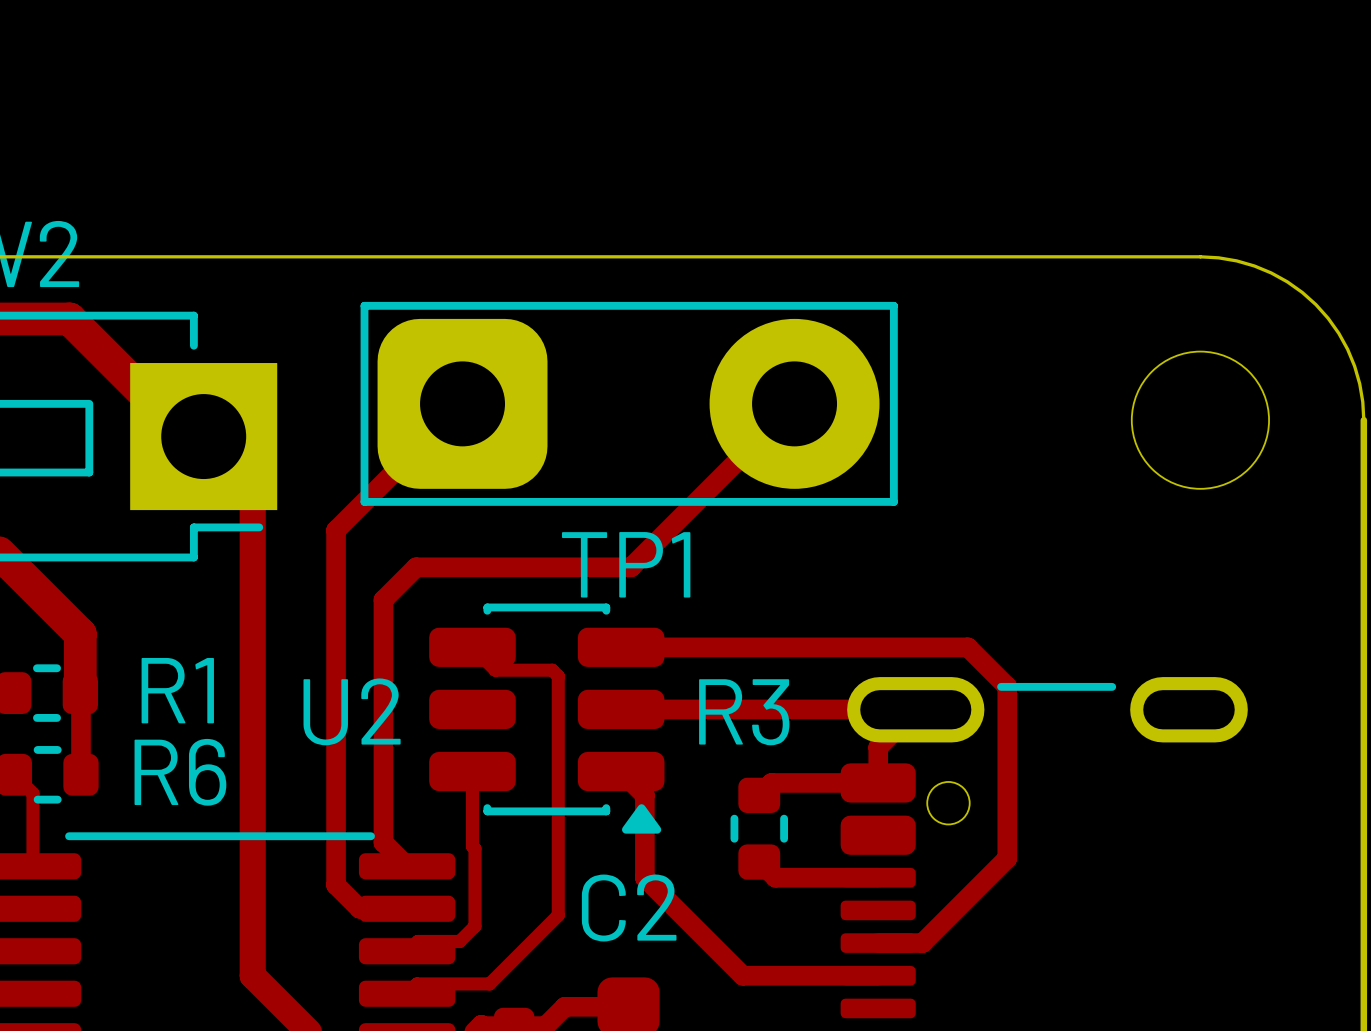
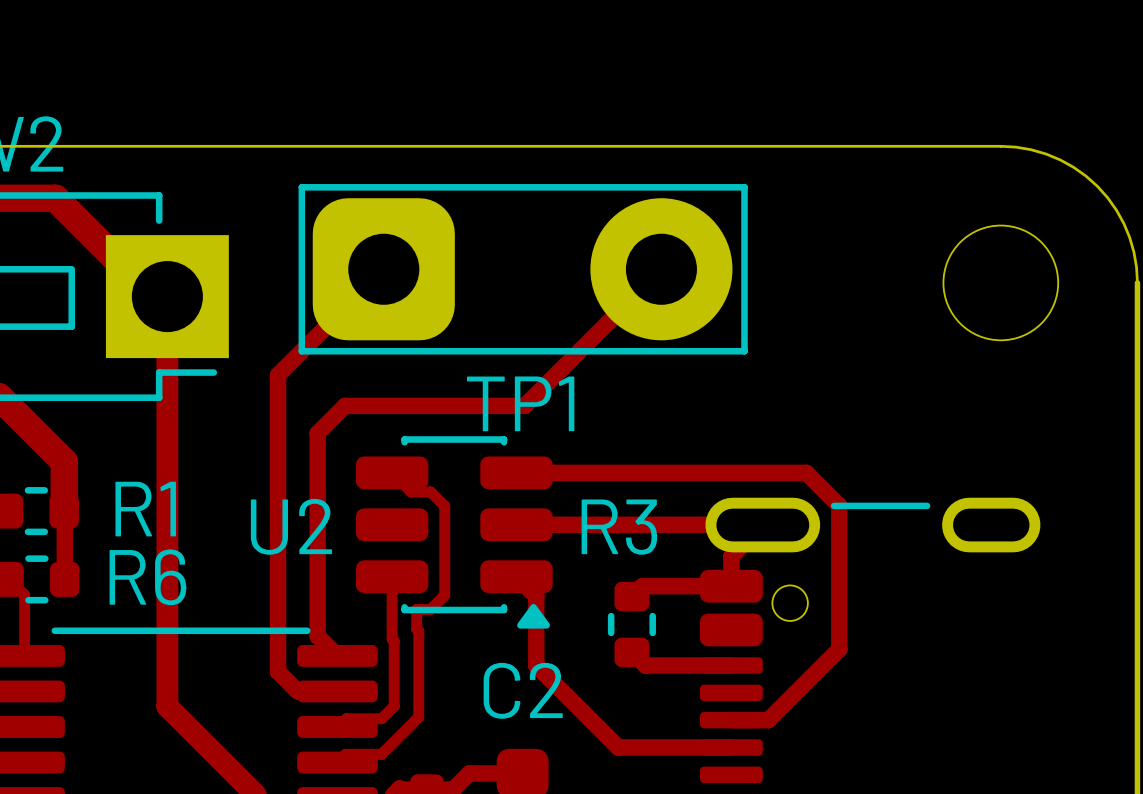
top track: (203, 436) (252, 485) (252, 975) -> (167, 296) (167, 706) (208, 747)
top track: (518, 670) (552, 670) (558, 676) (558, 915) (489, 983) (459, 983) -> (430, 491) (444, 506) (444, 595) (430, 609) (416, 609) (416, 629) (418, 631) (418, 717) (381, 754)

